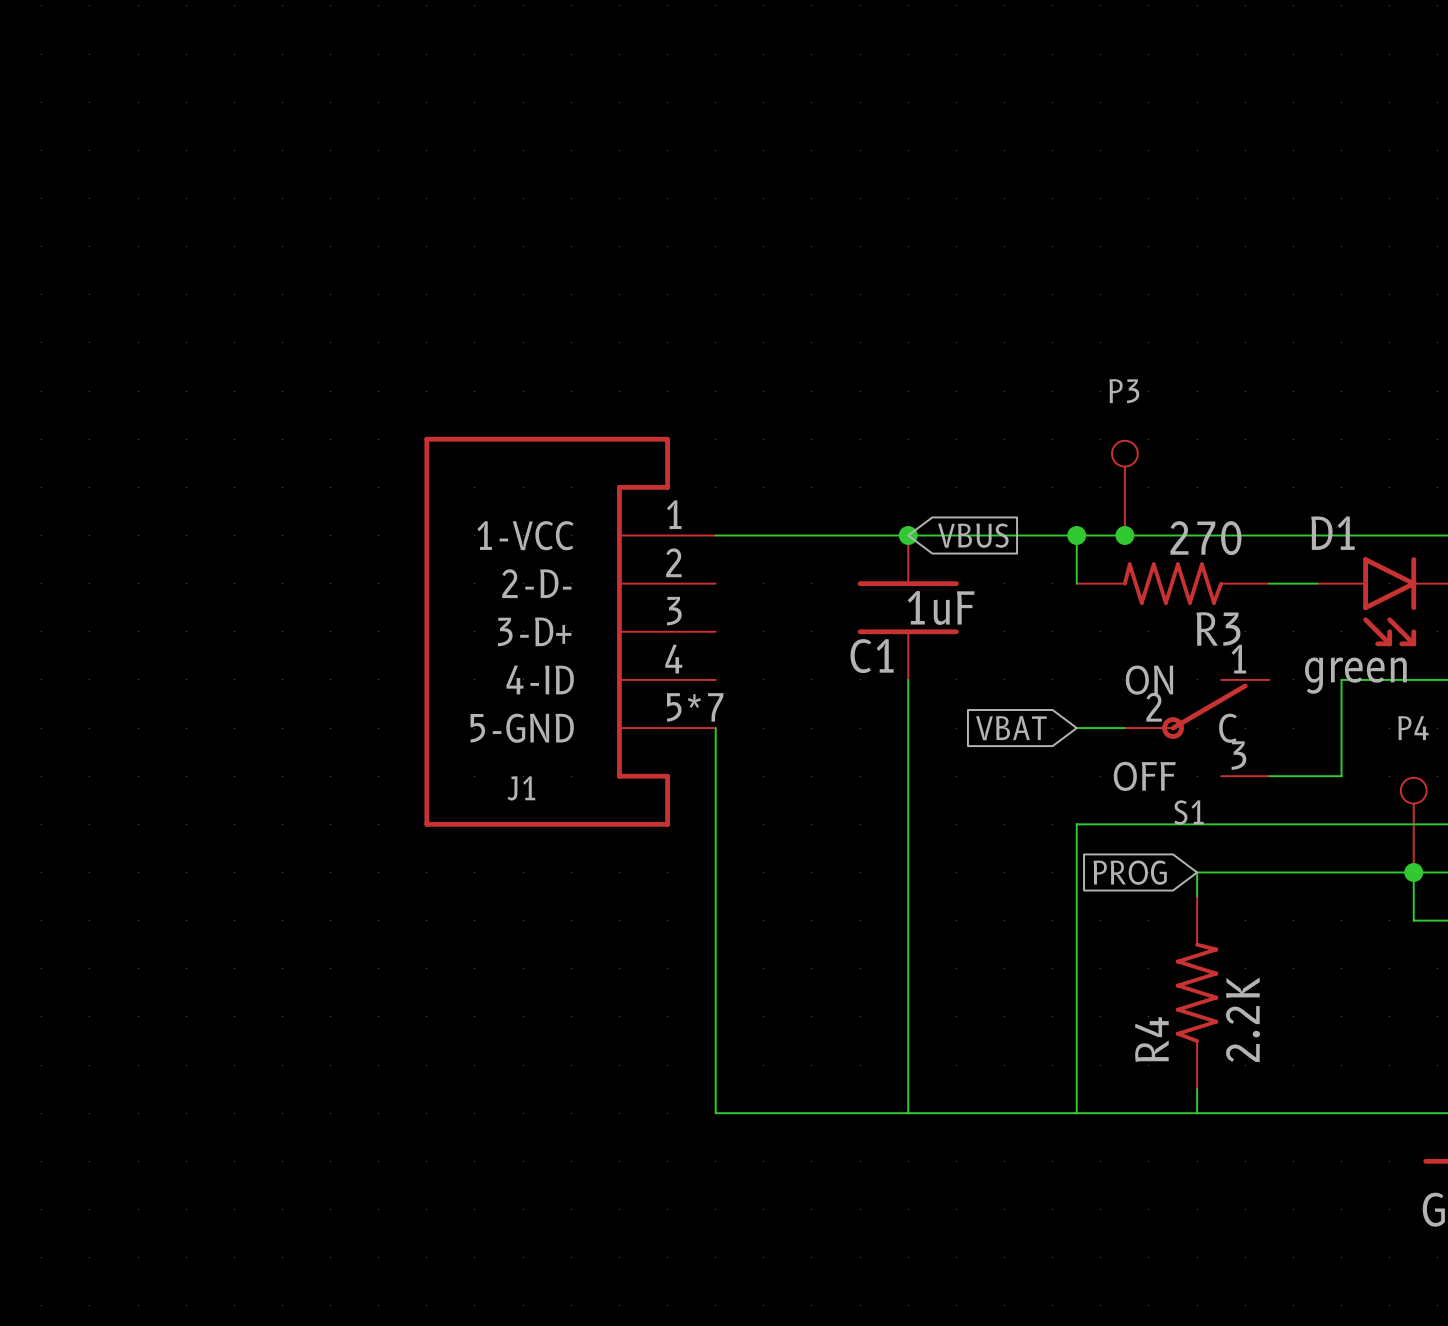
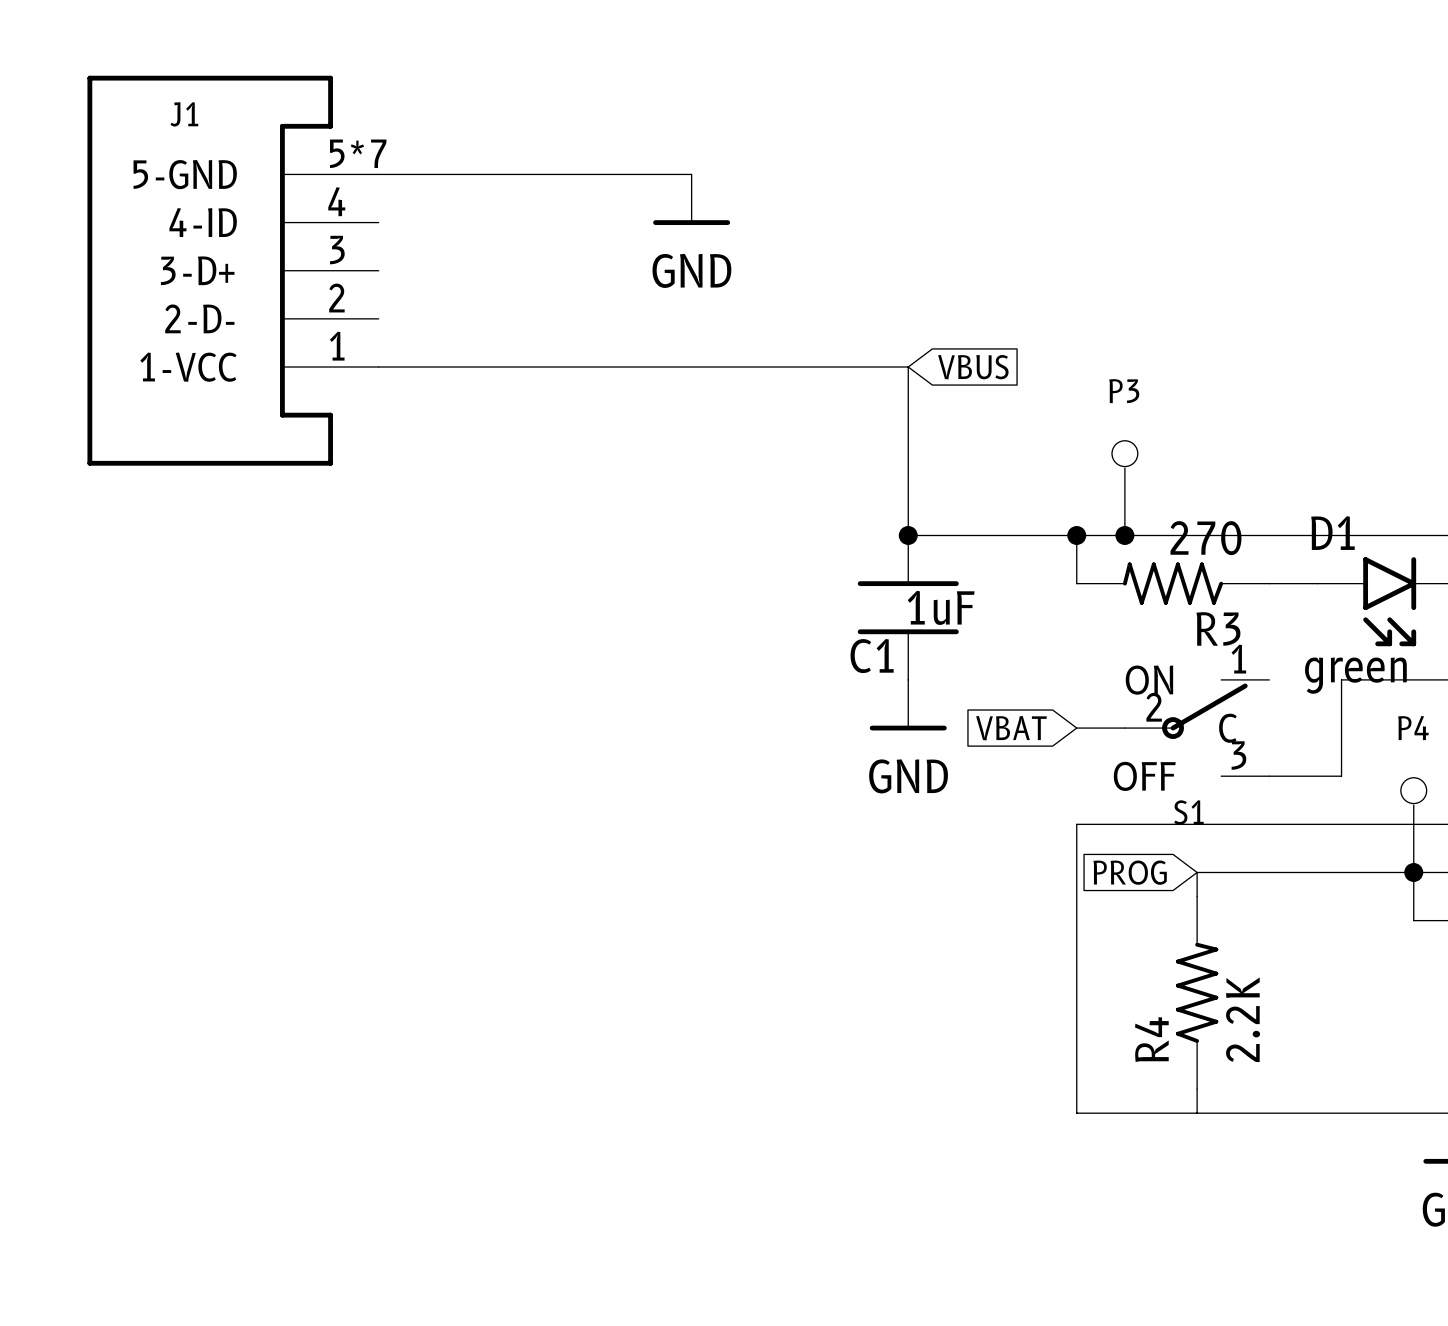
wire: none -> (378, 174) (691, 174)
power symbol: none -> GND (691, 199)
wire: (715, 535) (908, 535) -> (378, 367) (908, 367) (908, 535)
global label position: VBUS (973, 535) -> VBUS (973, 367)
J1 flip: as is (547, 631) -> up-down (210, 270)
J1 position: (570, 631) -> (233, 270)
wire: (908, 679) (908, 1113) -> none
power symbol: none -> GND (908, 705)
wire: (715, 728) (715, 1113) (1076, 1113) -> none

